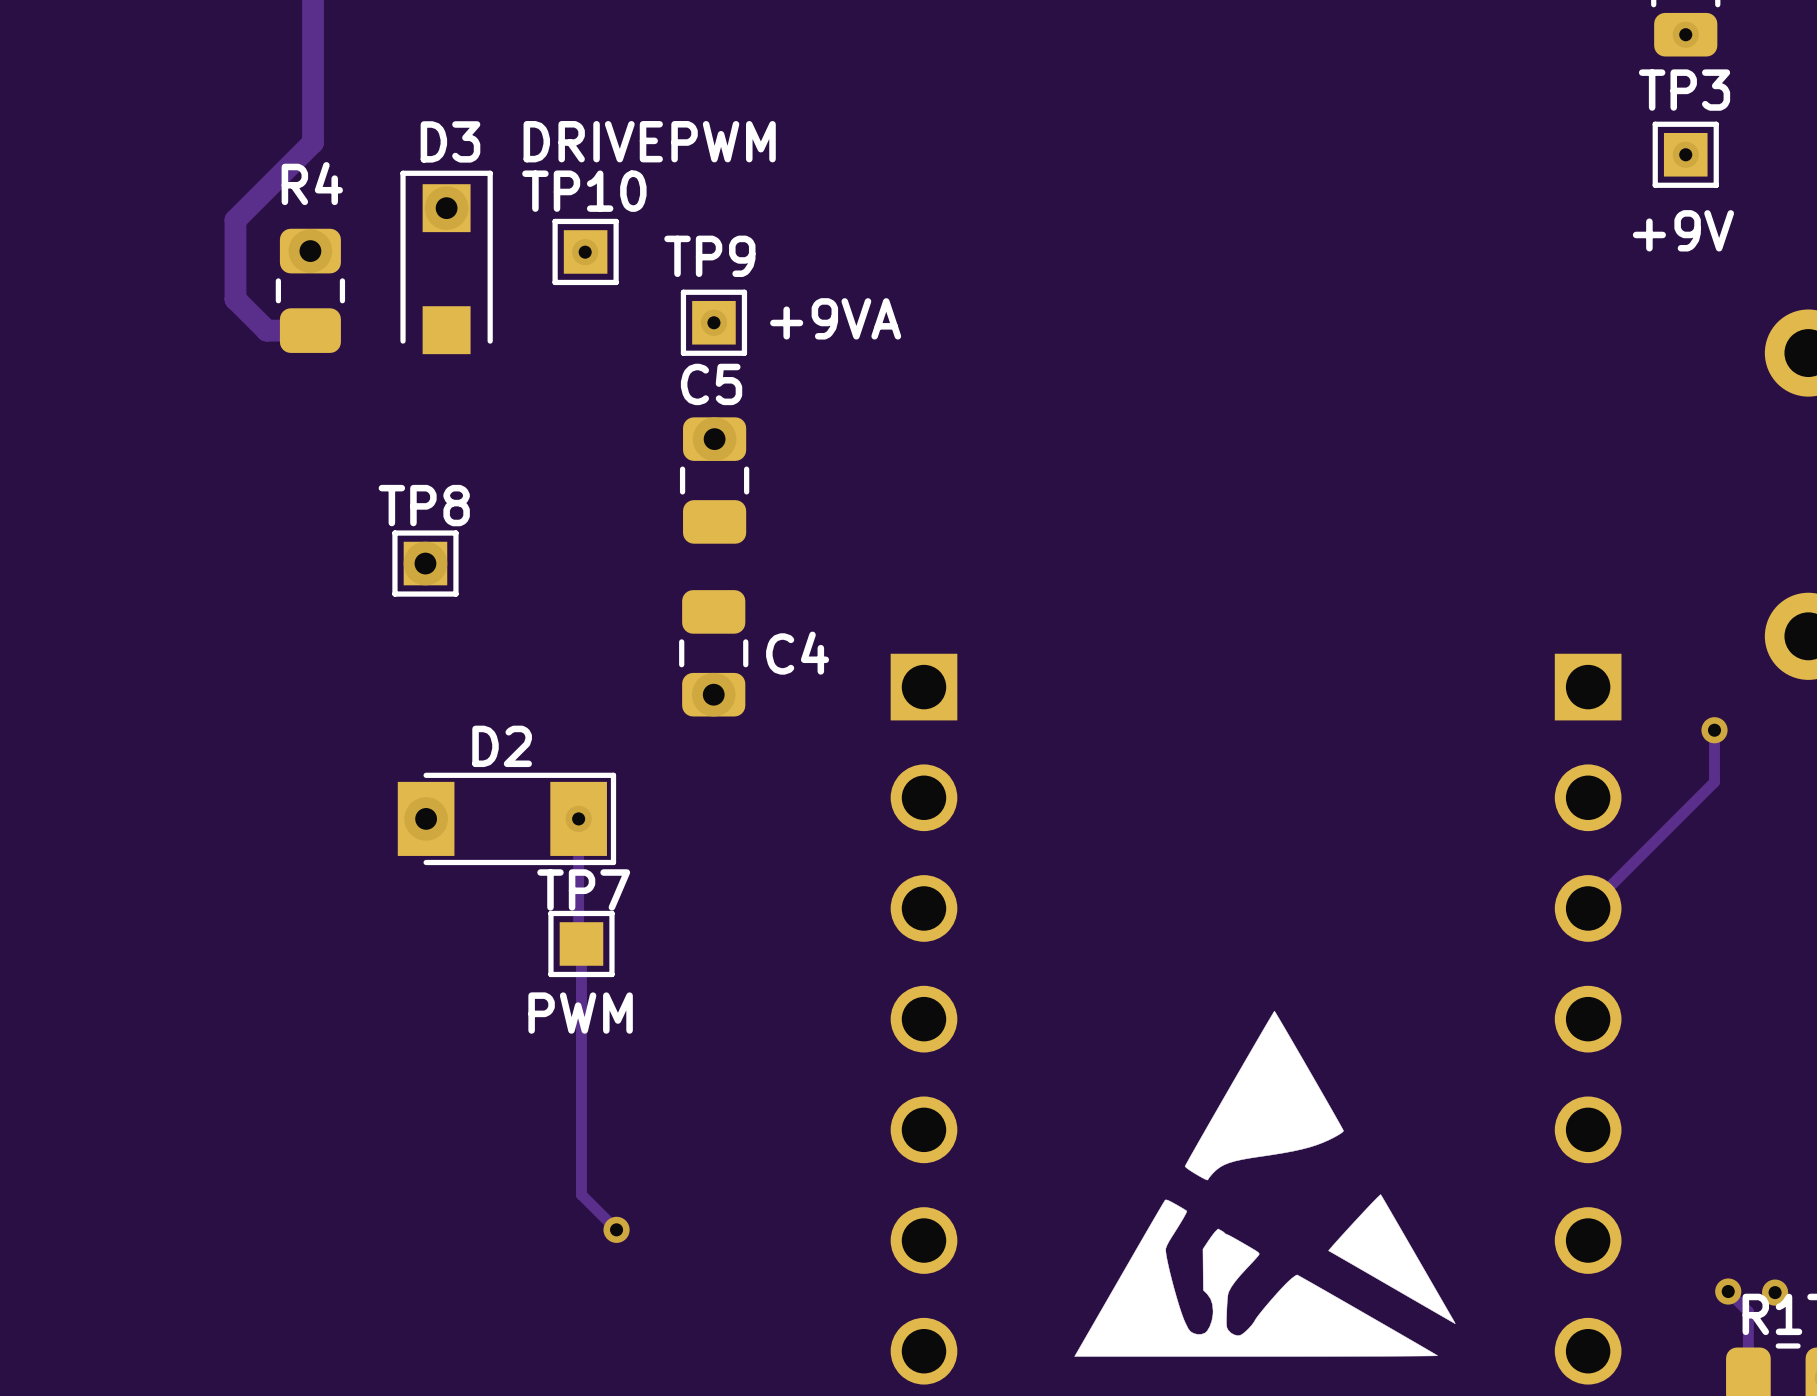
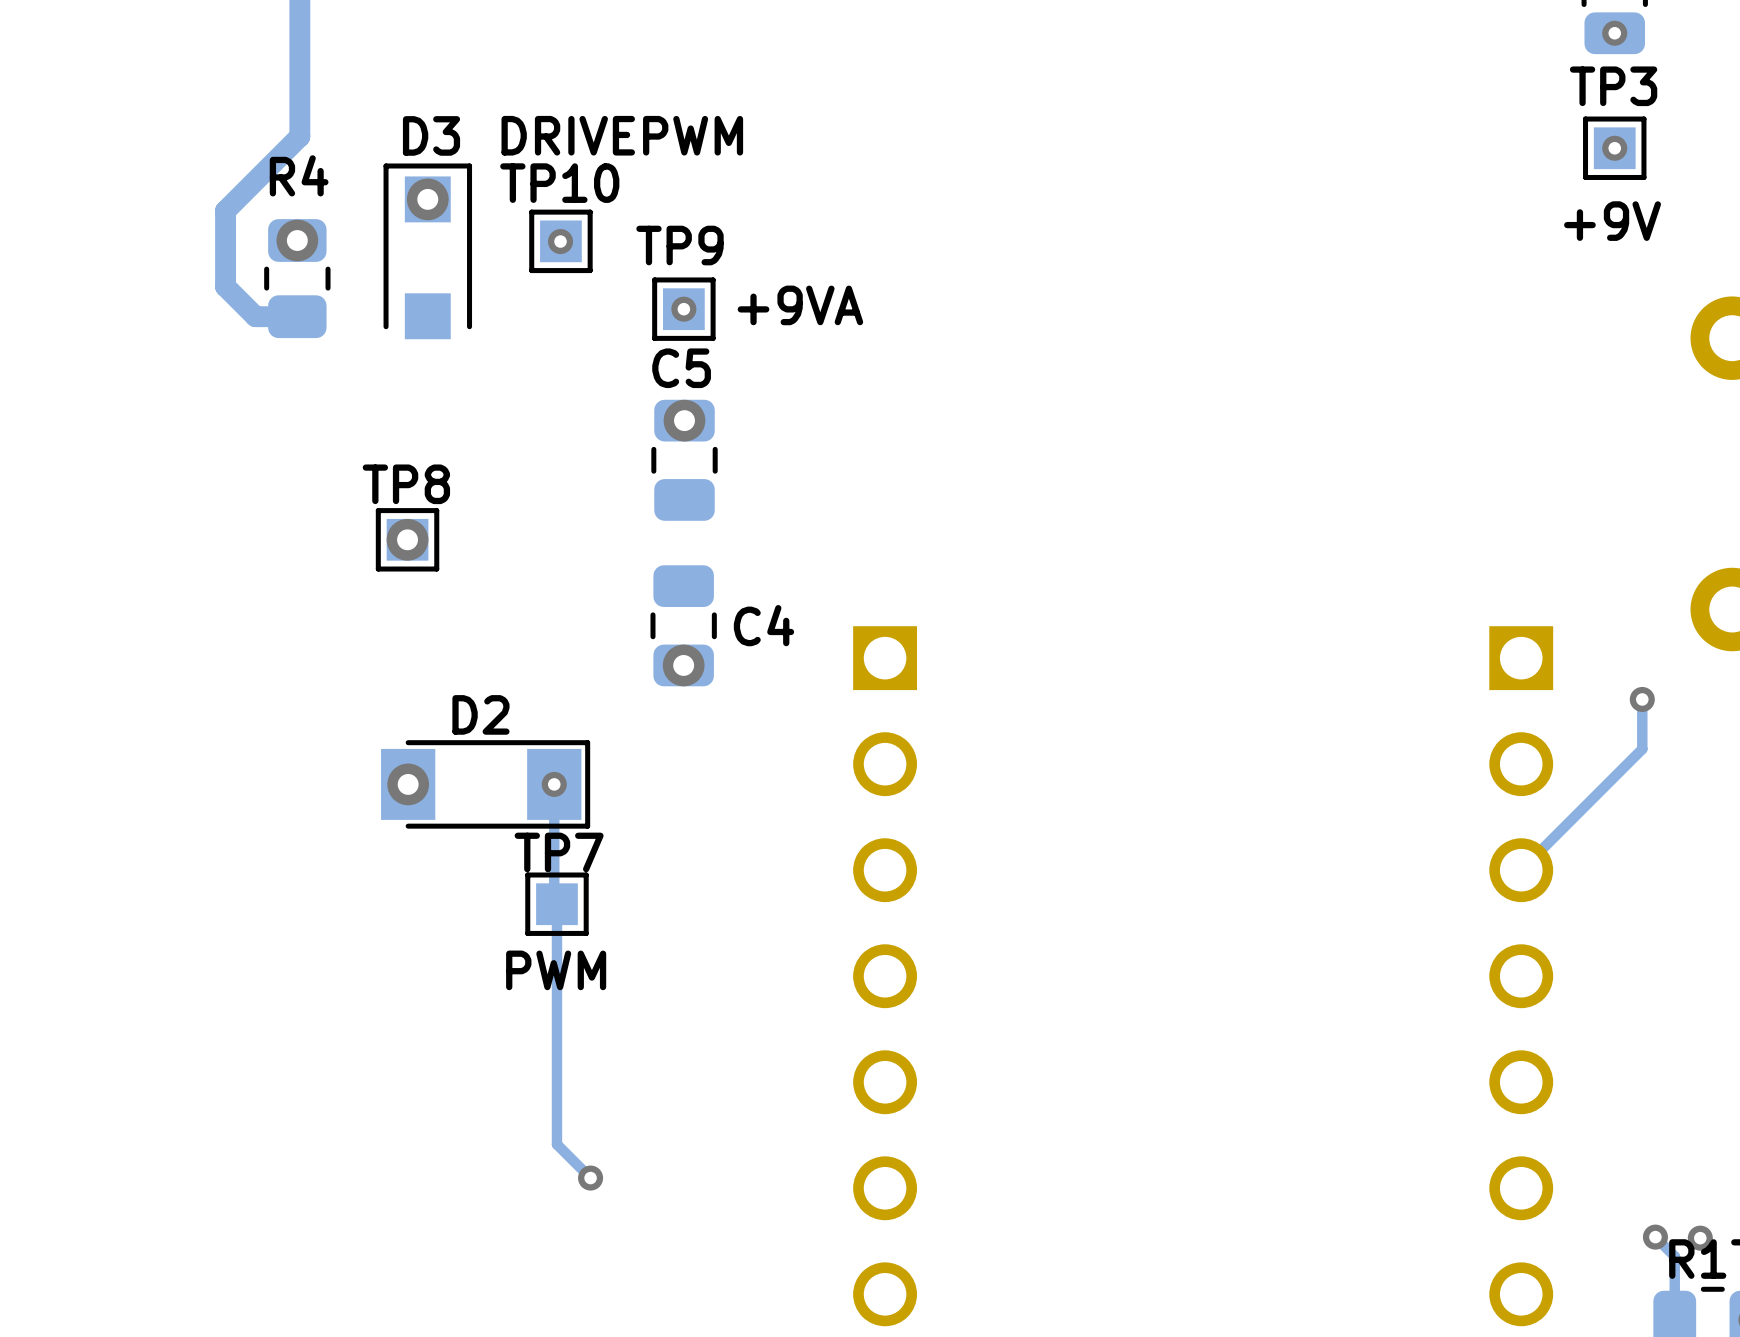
drawing: [1074, 1010, 1456, 1357] -> none

